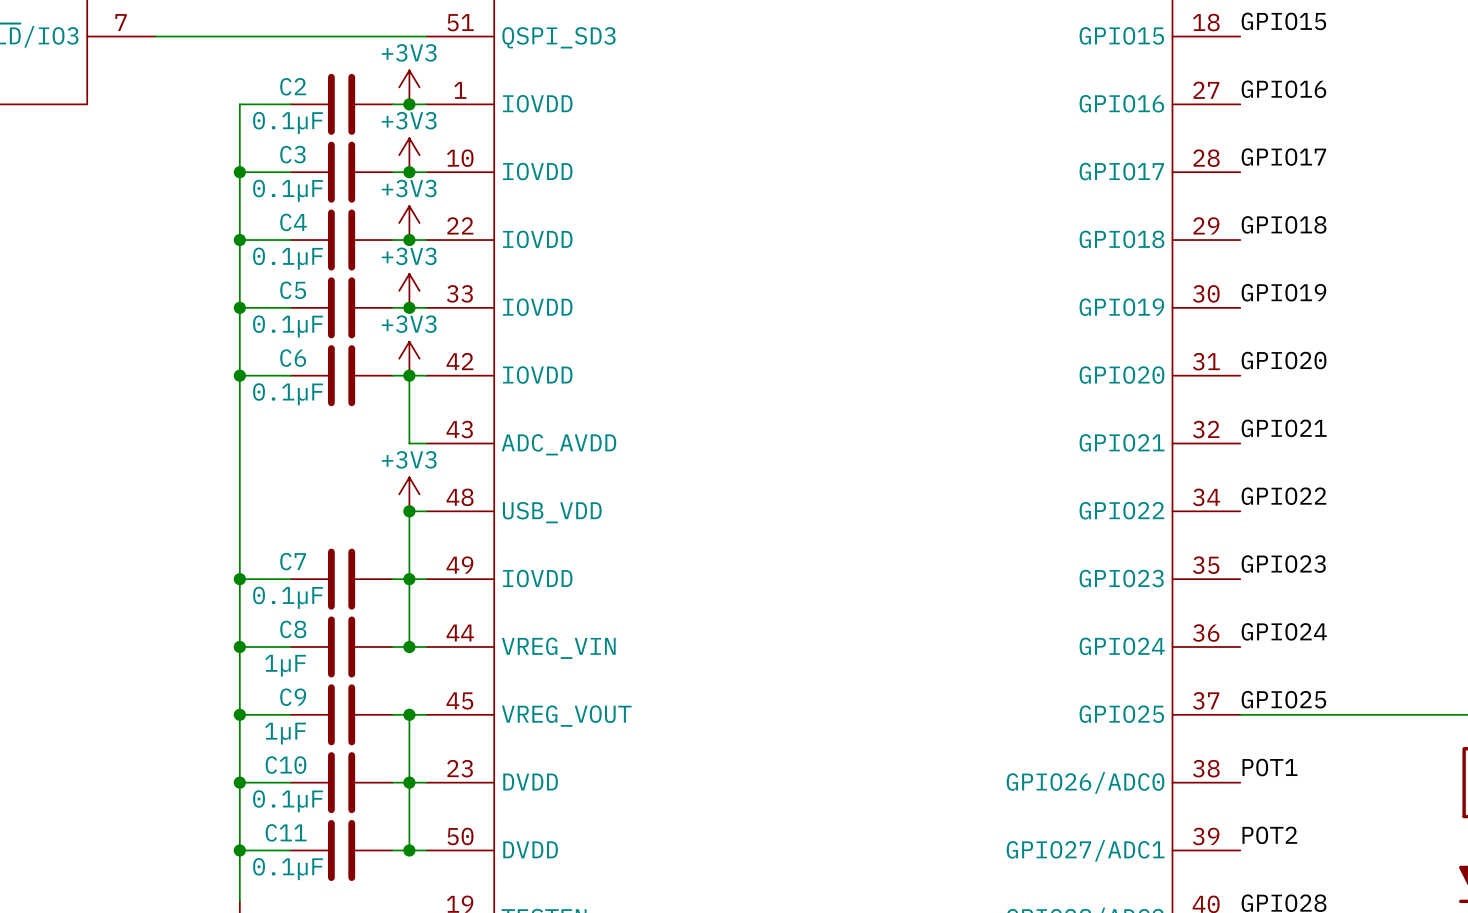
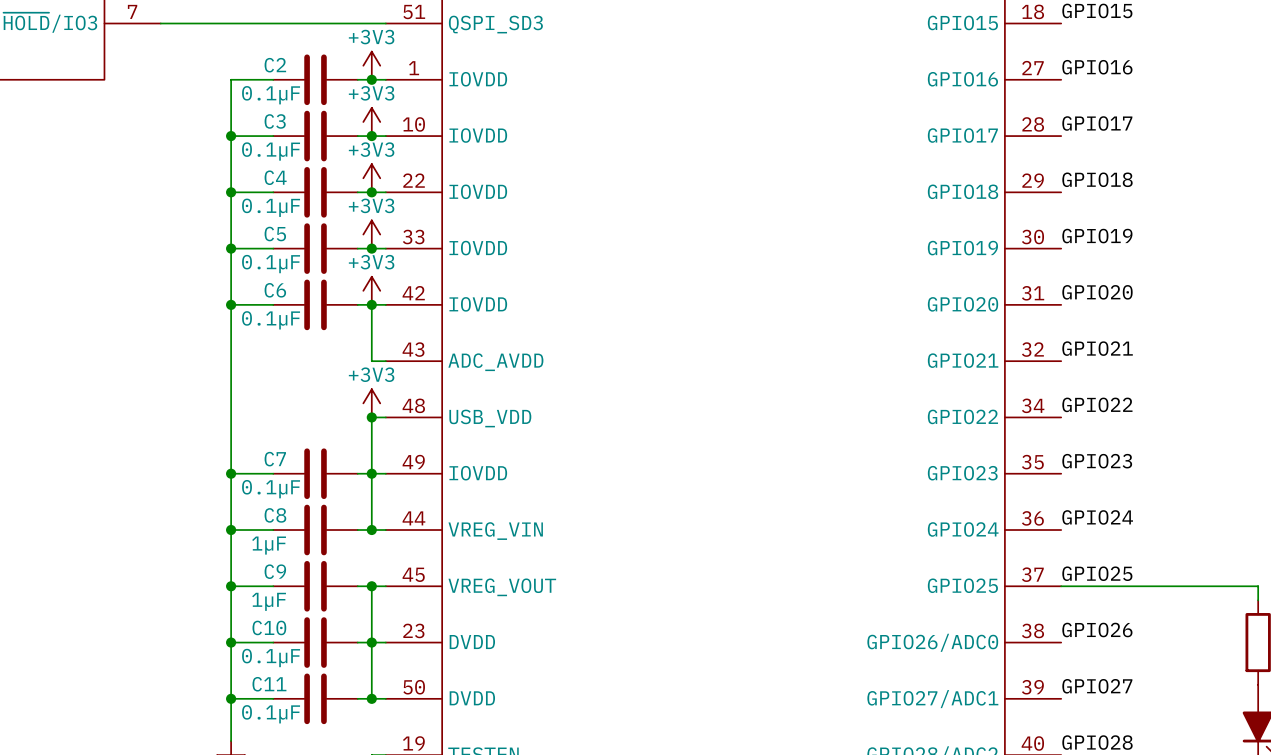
label: POT1 (1269, 767) -> GPIO26 (1097, 630)
label: POT2 (1269, 835) -> GPIO27 (1097, 686)

